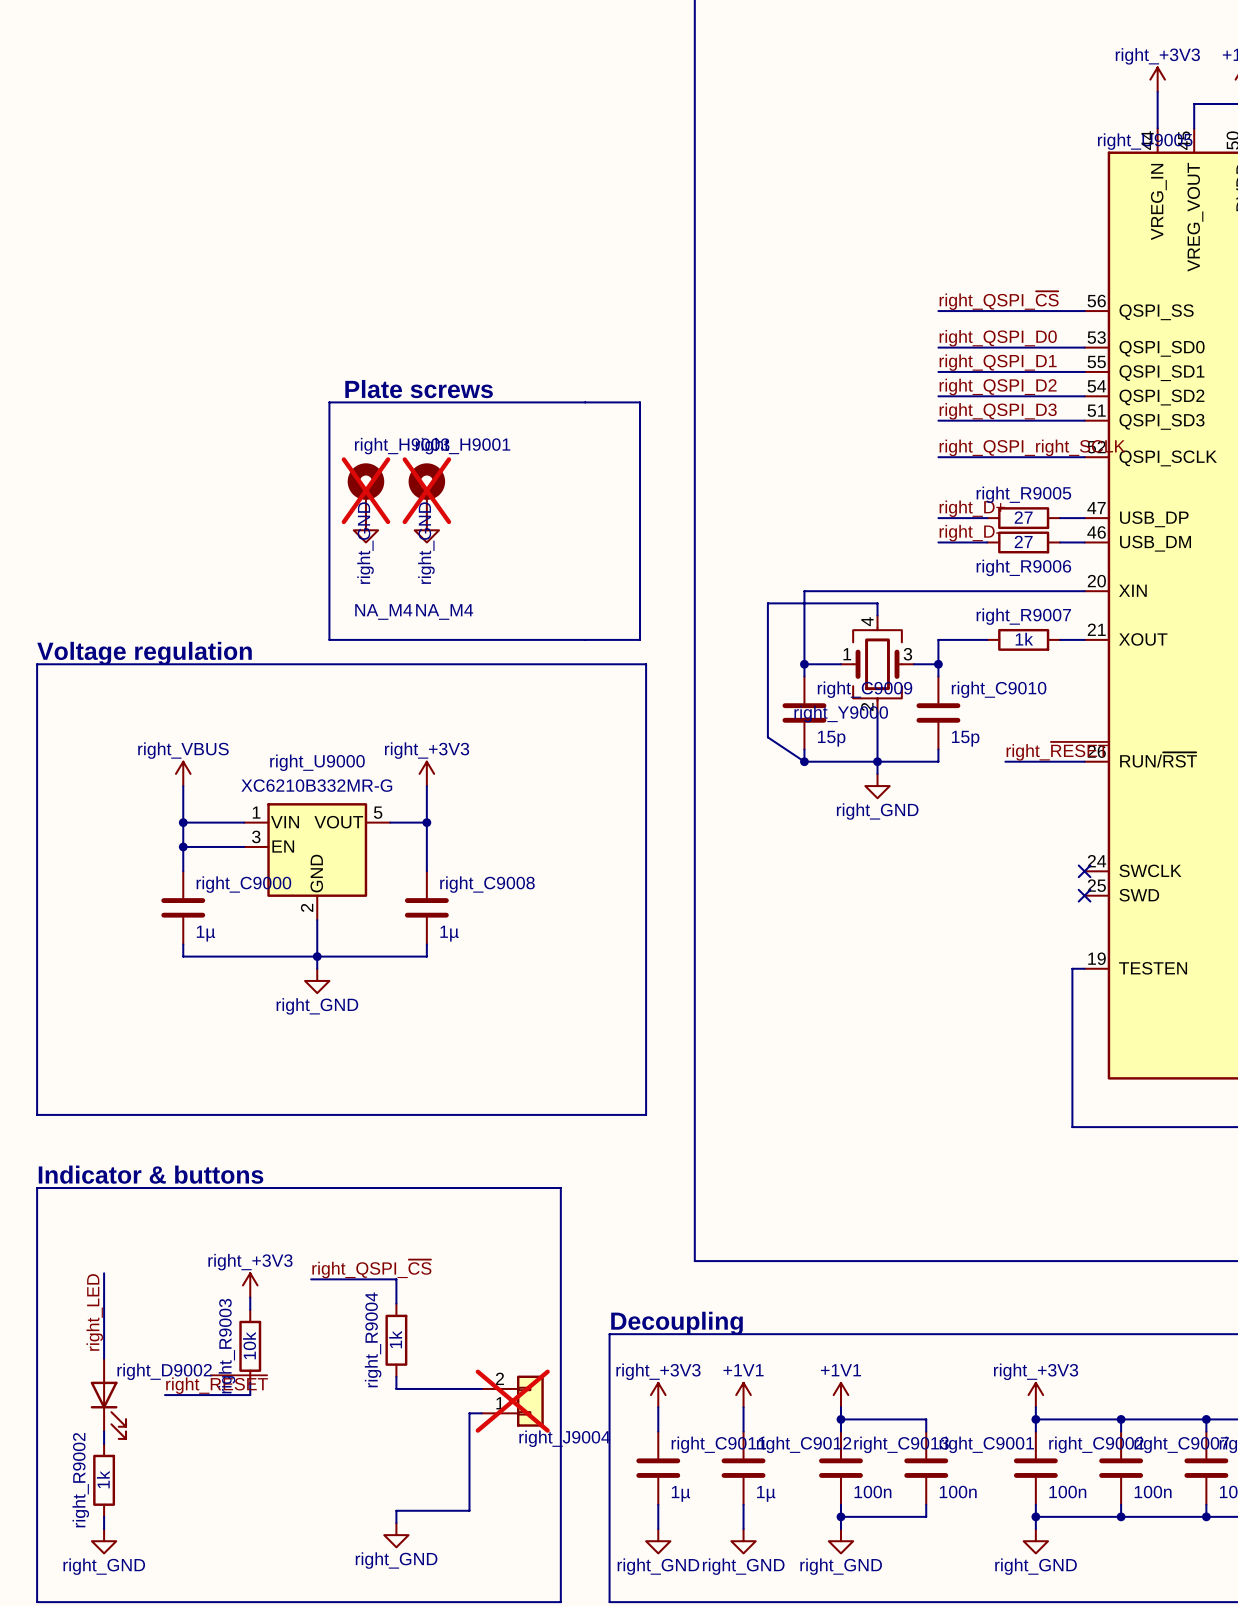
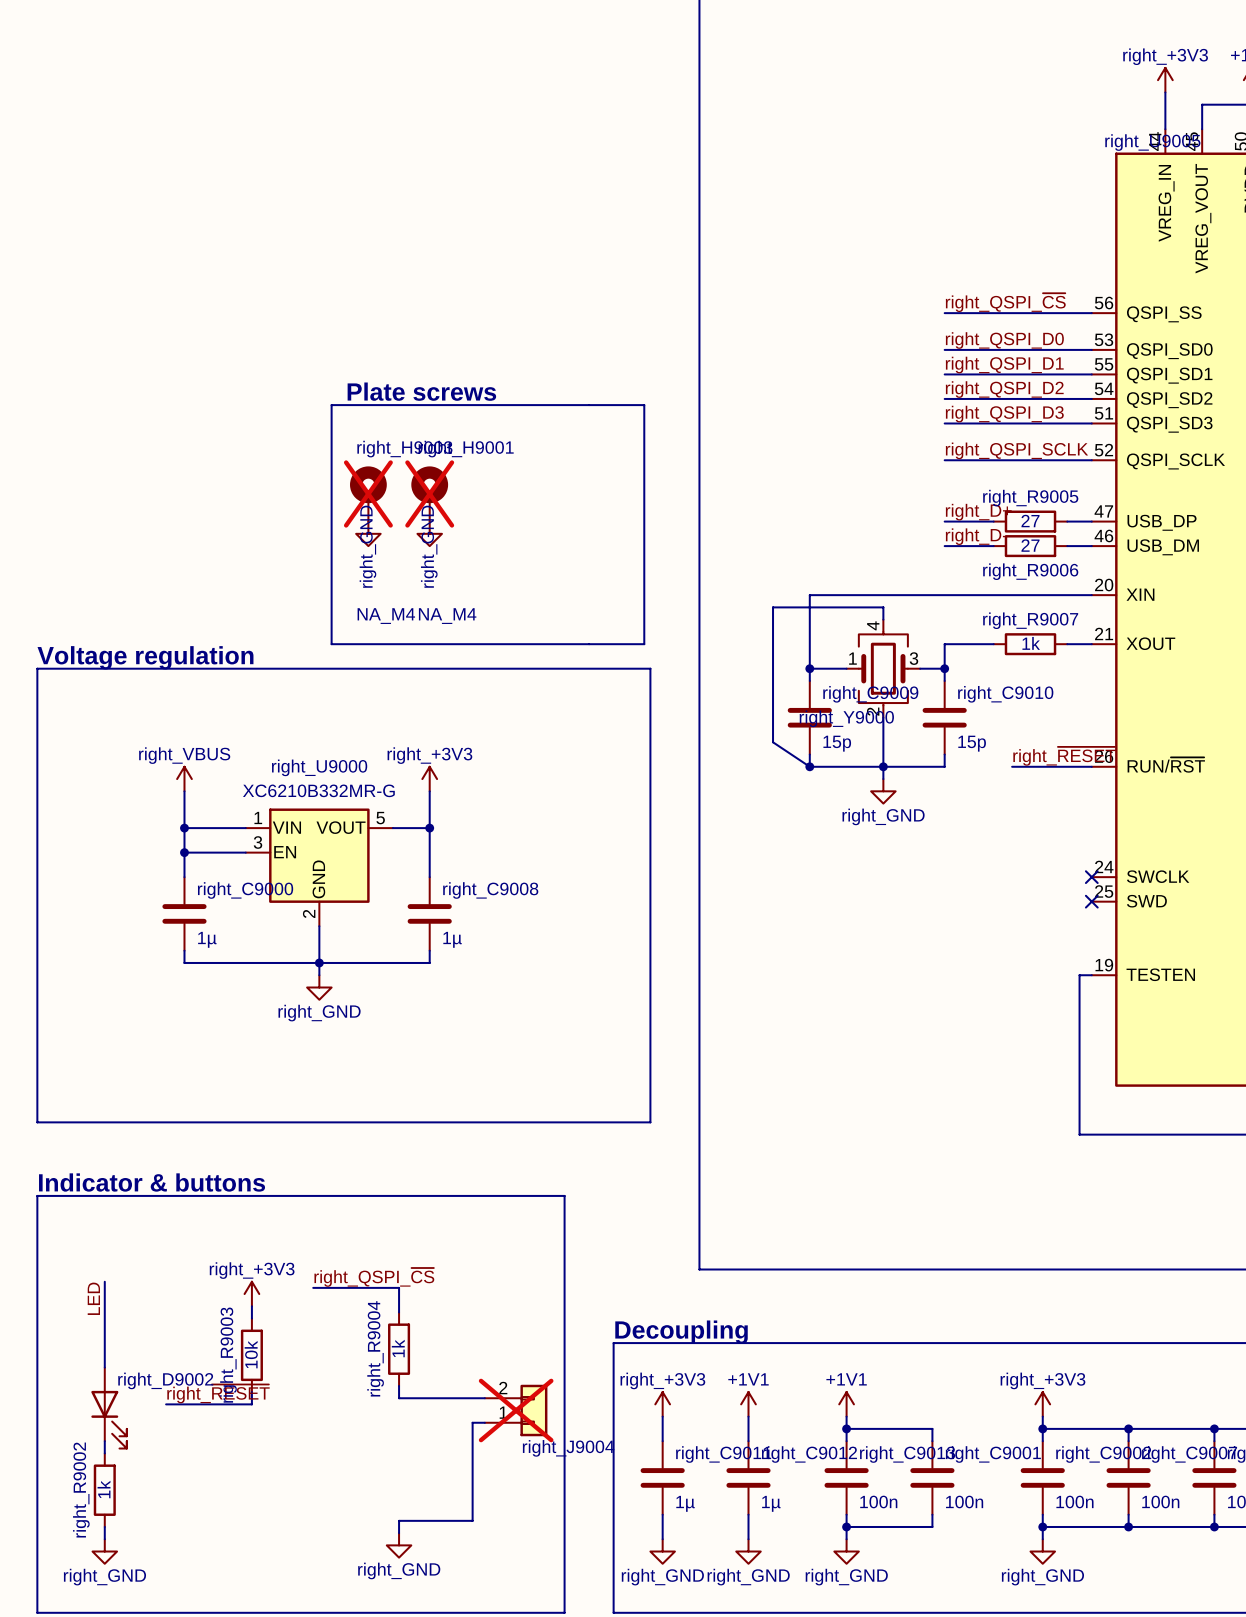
label: right_QSPI_right_SCLK (1032, 447) -> right_QSPI_SCLK (1016, 450)
label: right_LED (94, 1312) -> LED (93, 1298)

